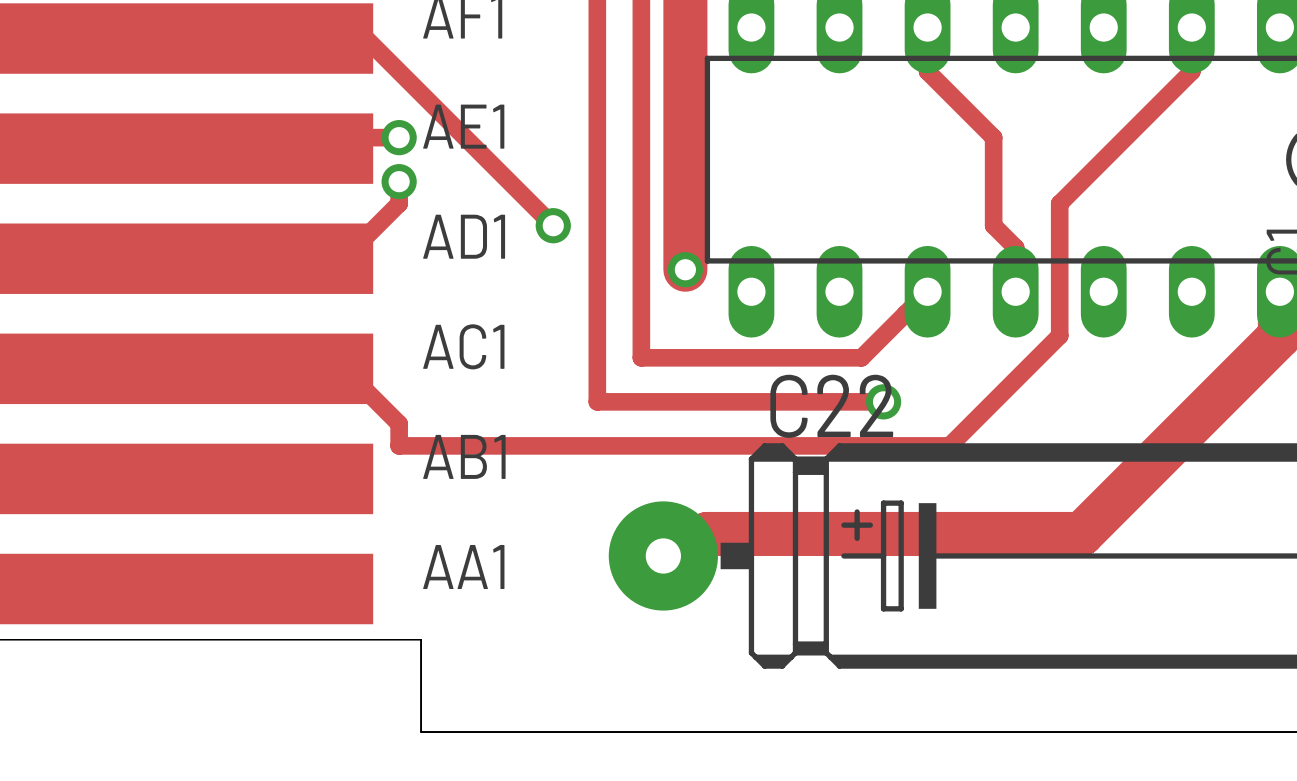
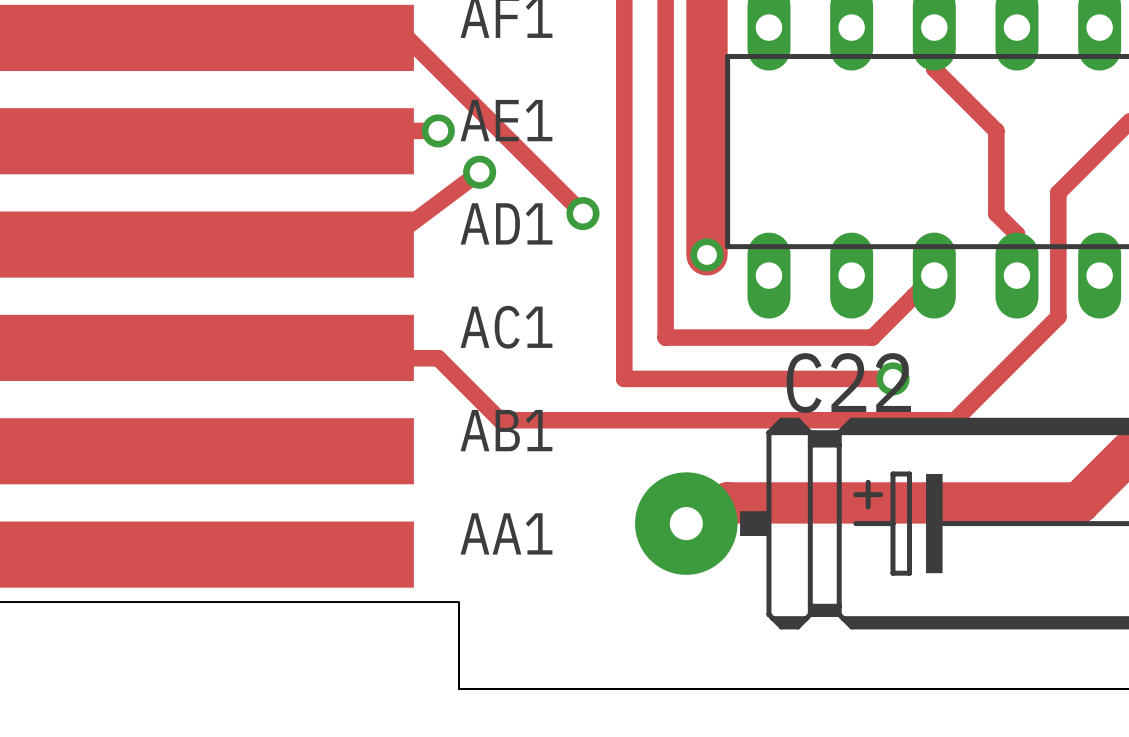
track: (399, 181) (399, 203) (355, 247) -> (479, 172) (396, 234)
via position: (399, 181) -> (479, 172)
track: (355, 379) (399, 423) (399, 445) (465, 445) -> (396, 358) (438, 358) (500, 420)

